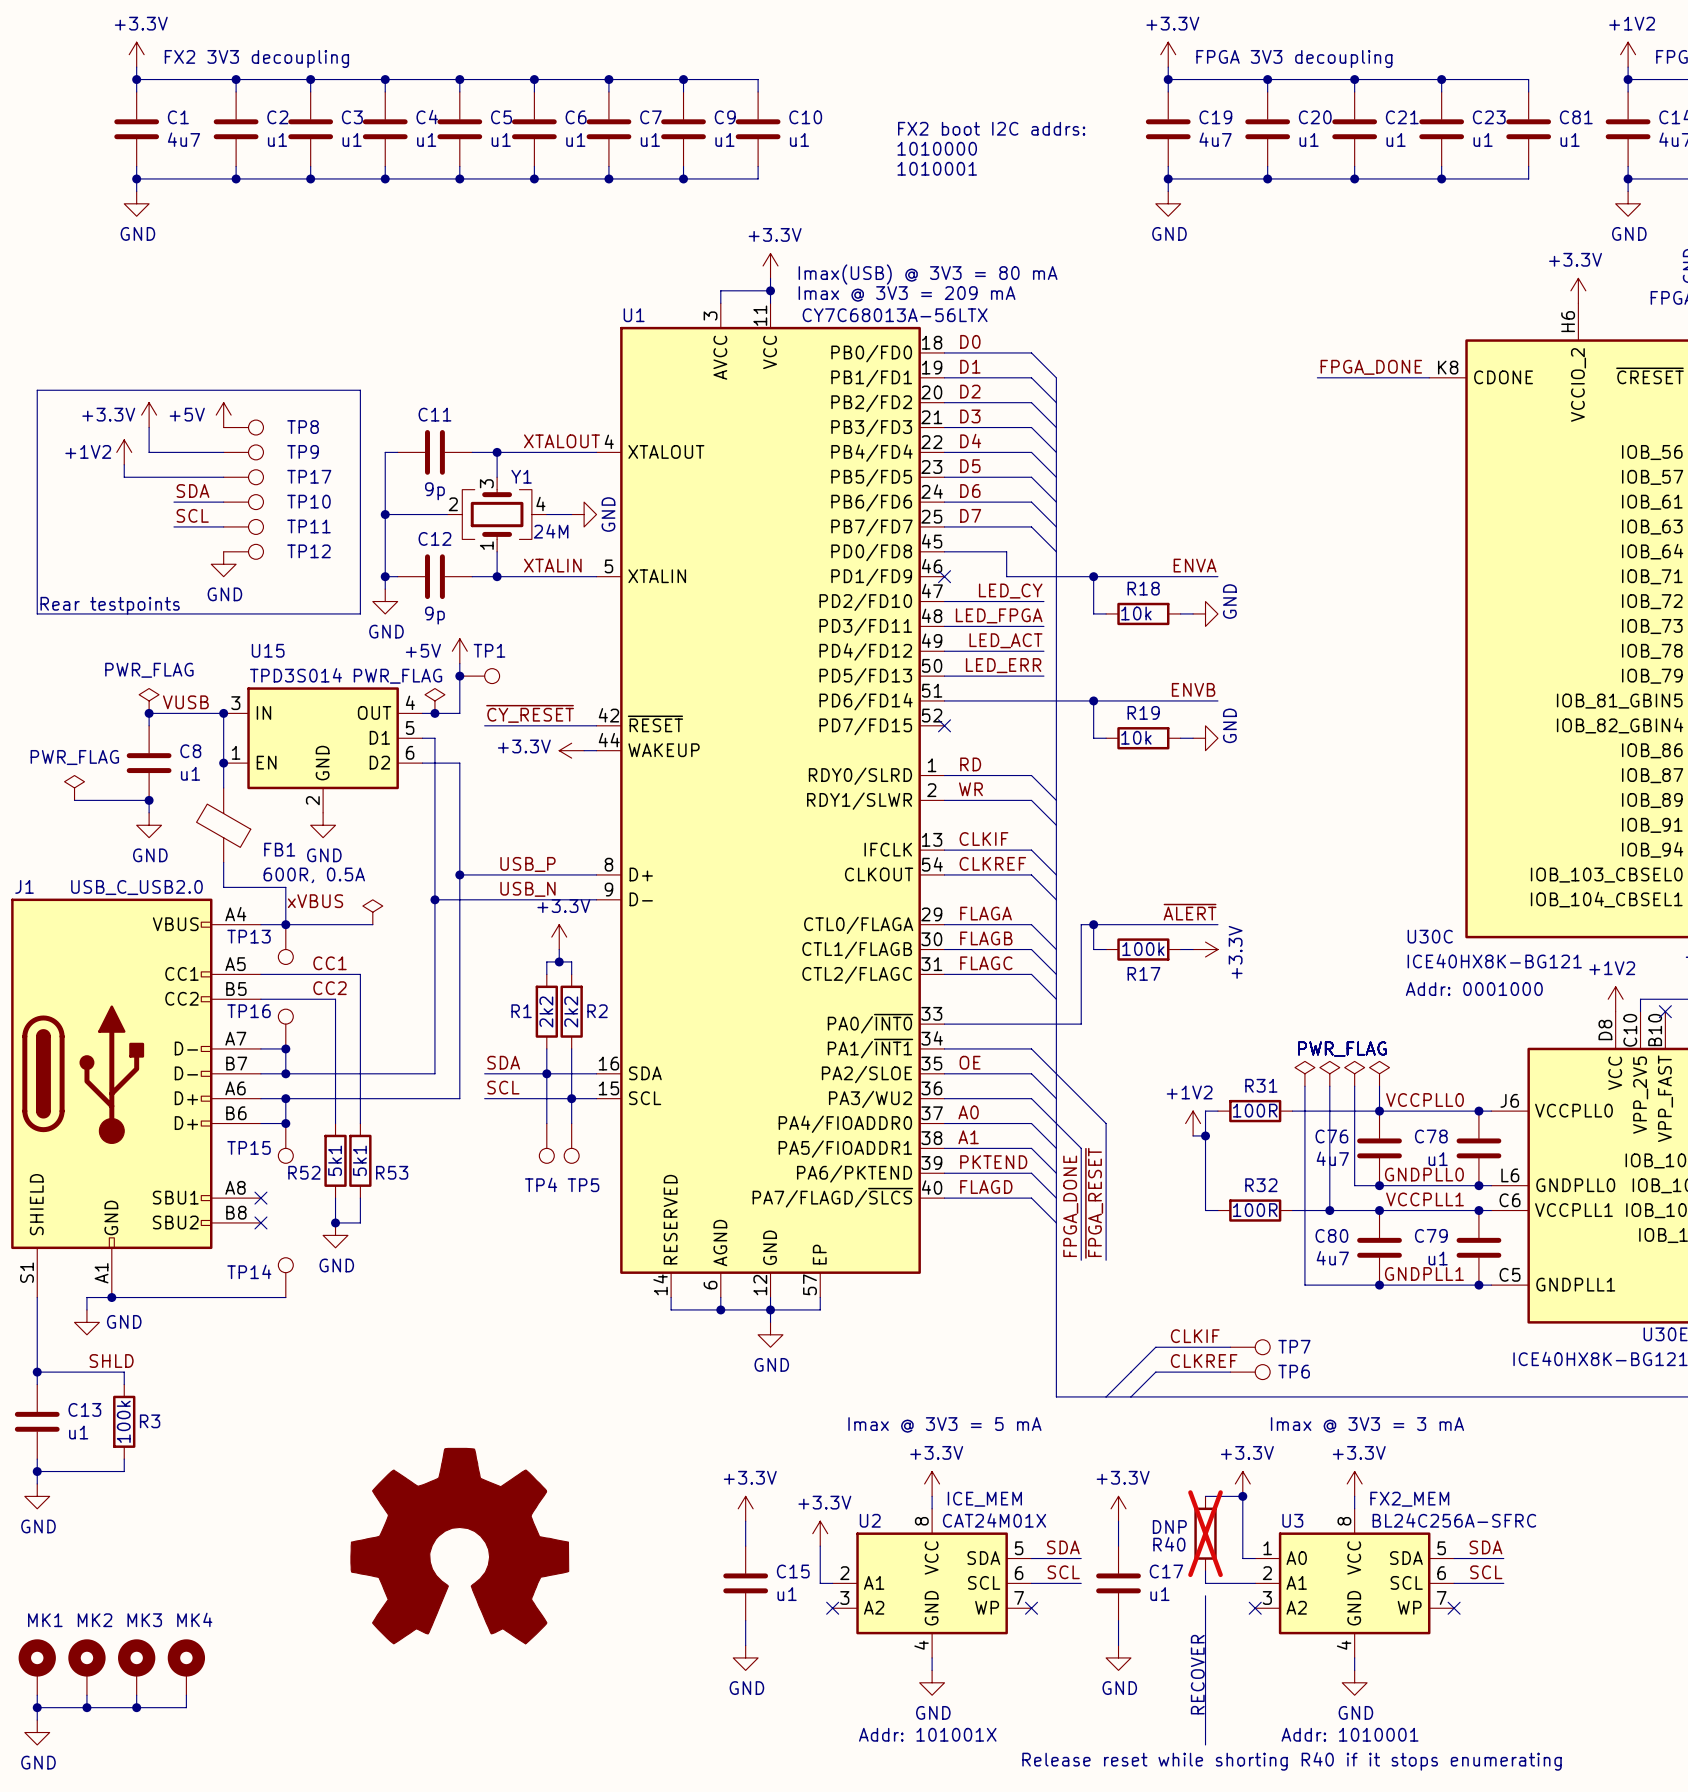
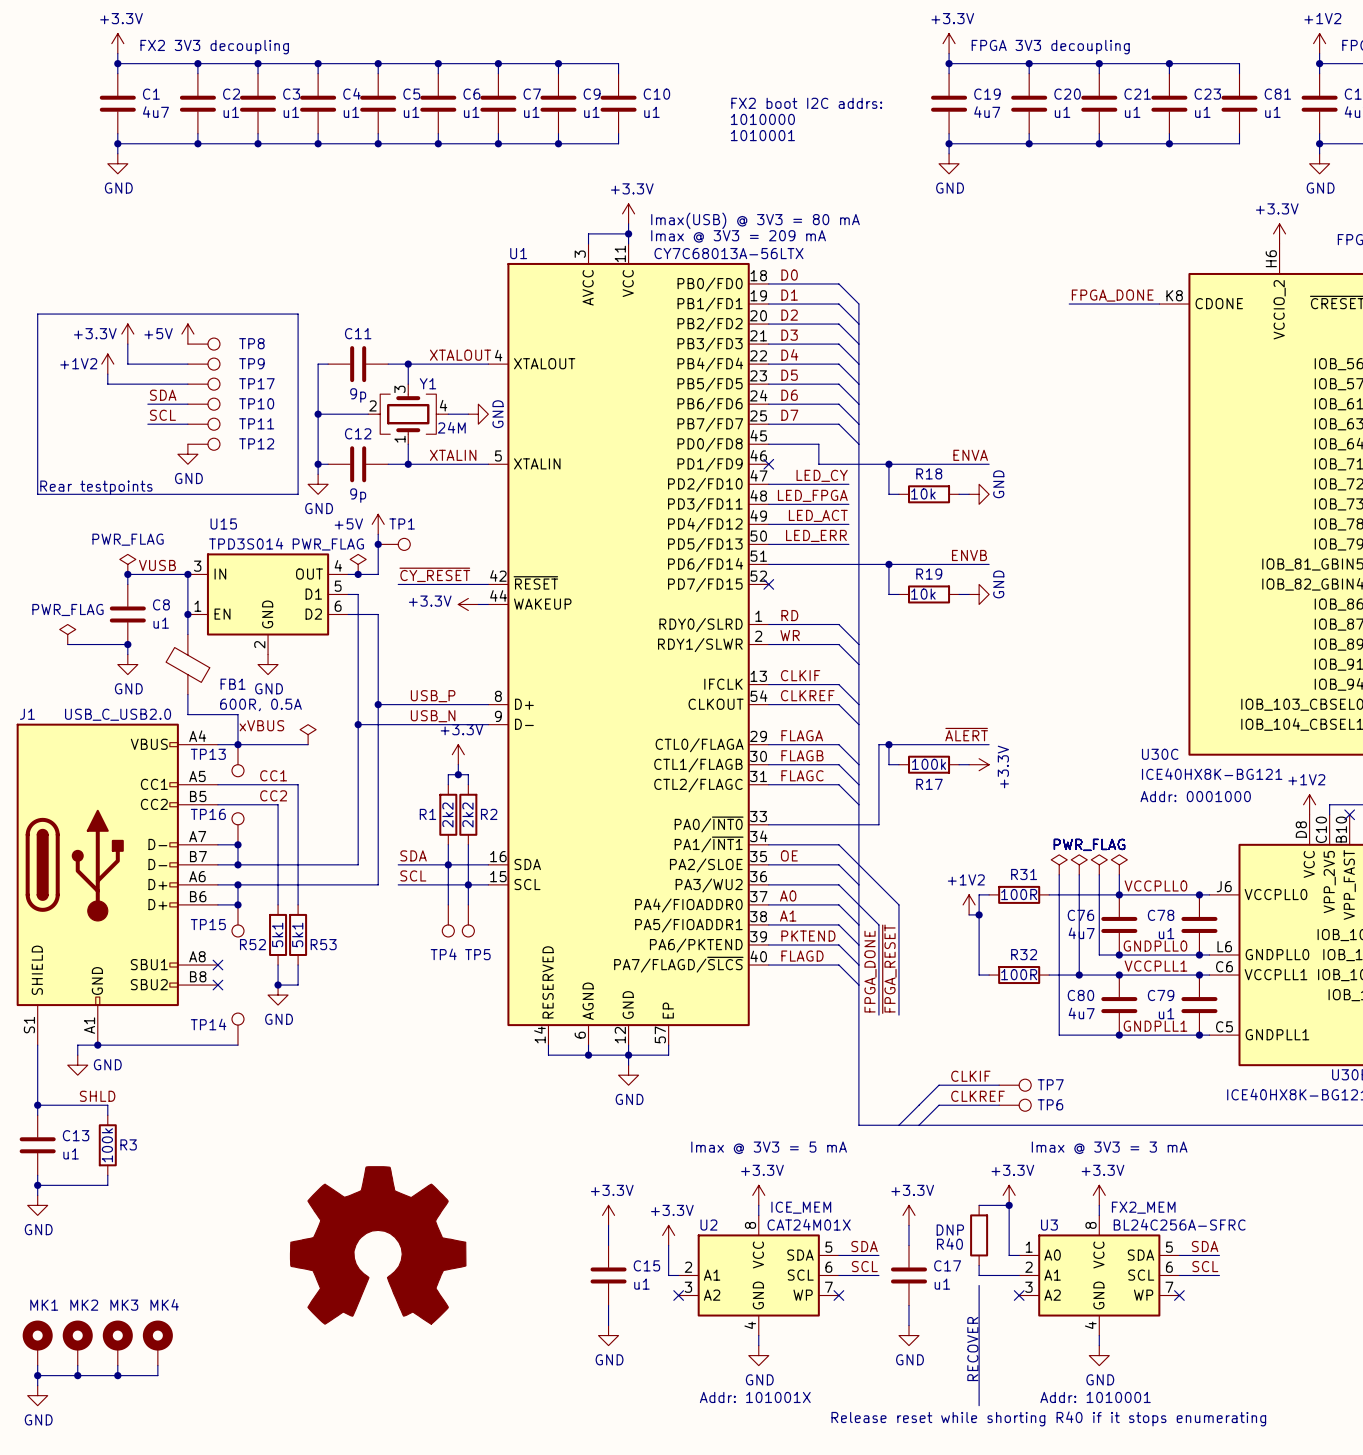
R40 do-not-place cross: (1205, 1533) -> none

